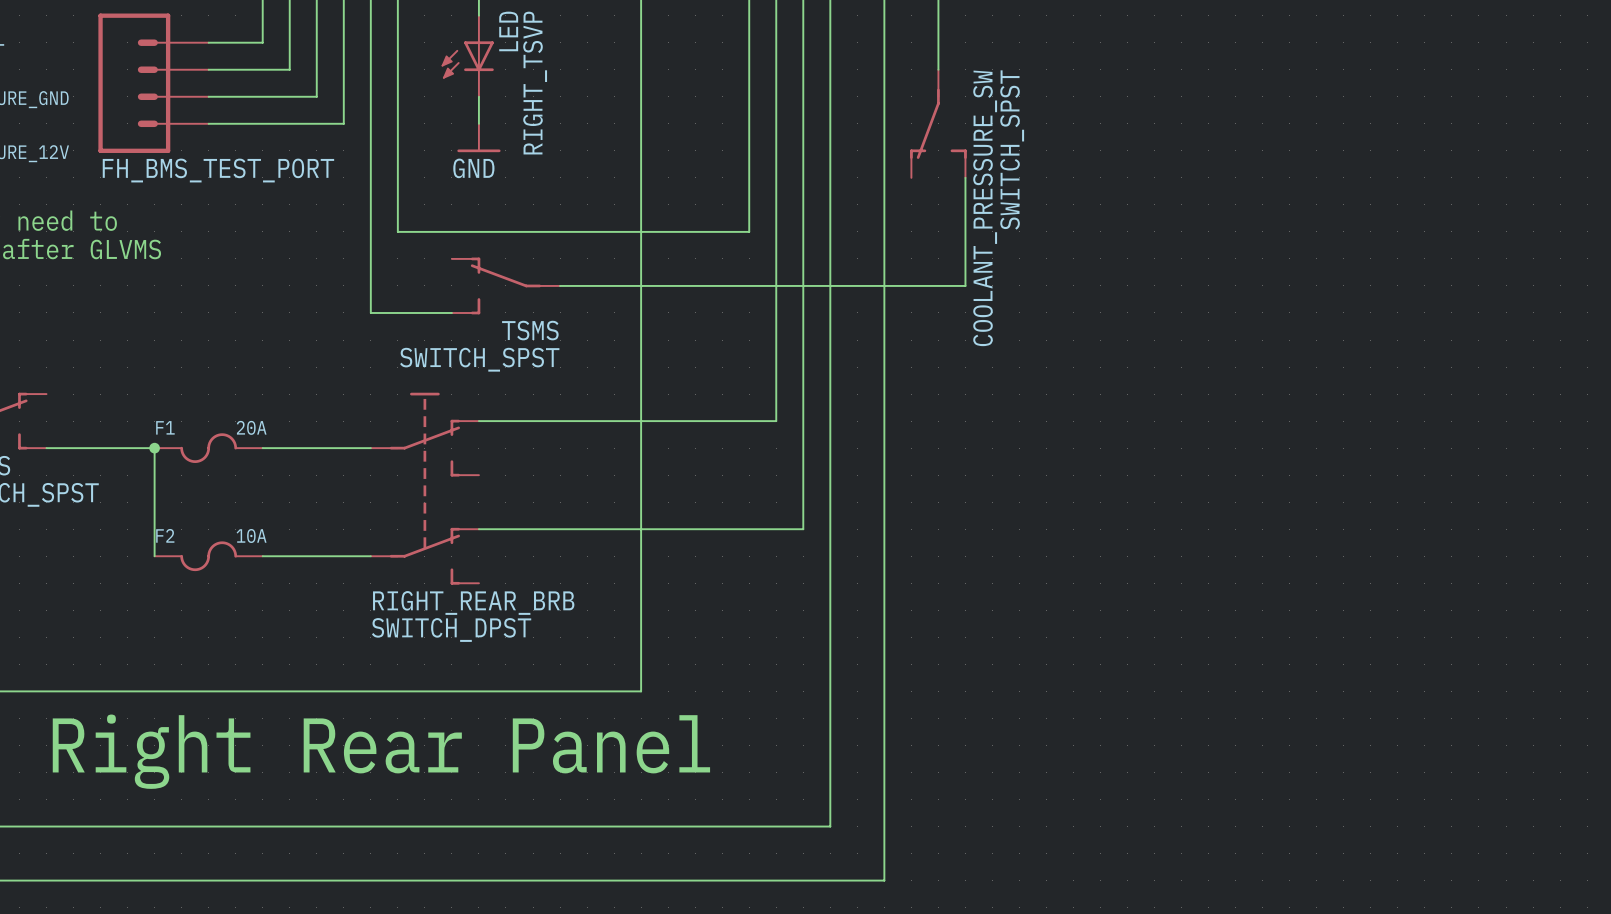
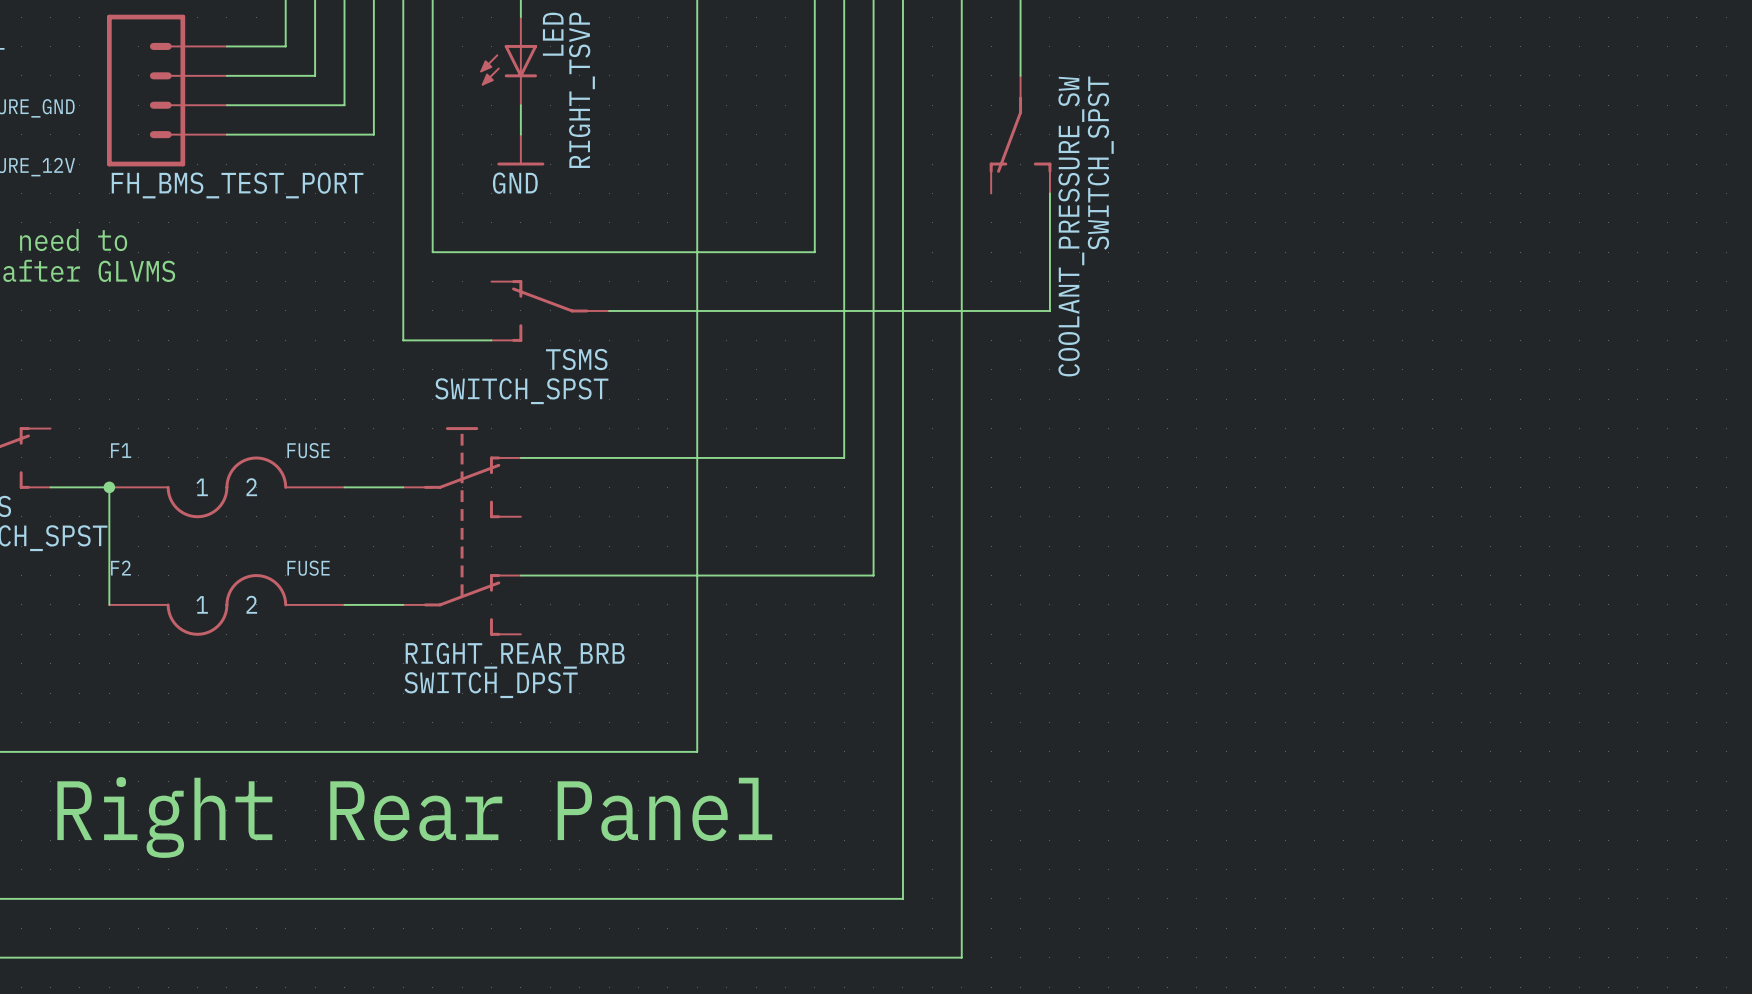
F1 name position: F1 (165, 427) -> F1 (121, 450)
F1 value: 20A (251, 427) -> FUSE (308, 450)
F1 symbol: [154, 433, 263, 464] -> [109, 456, 345, 519]
wire: (100, 448) (154, 448) (154, 556) -> (109, 487) (109, 604)
junction position: (154, 448) -> (109, 487)
F2 name position: F2 (165, 535) -> F2 (120, 568)
F2 value: 10A (251, 535) -> FUSE (308, 568)
F2 symbol: [154, 541, 263, 572] -> [109, 574, 345, 636]

